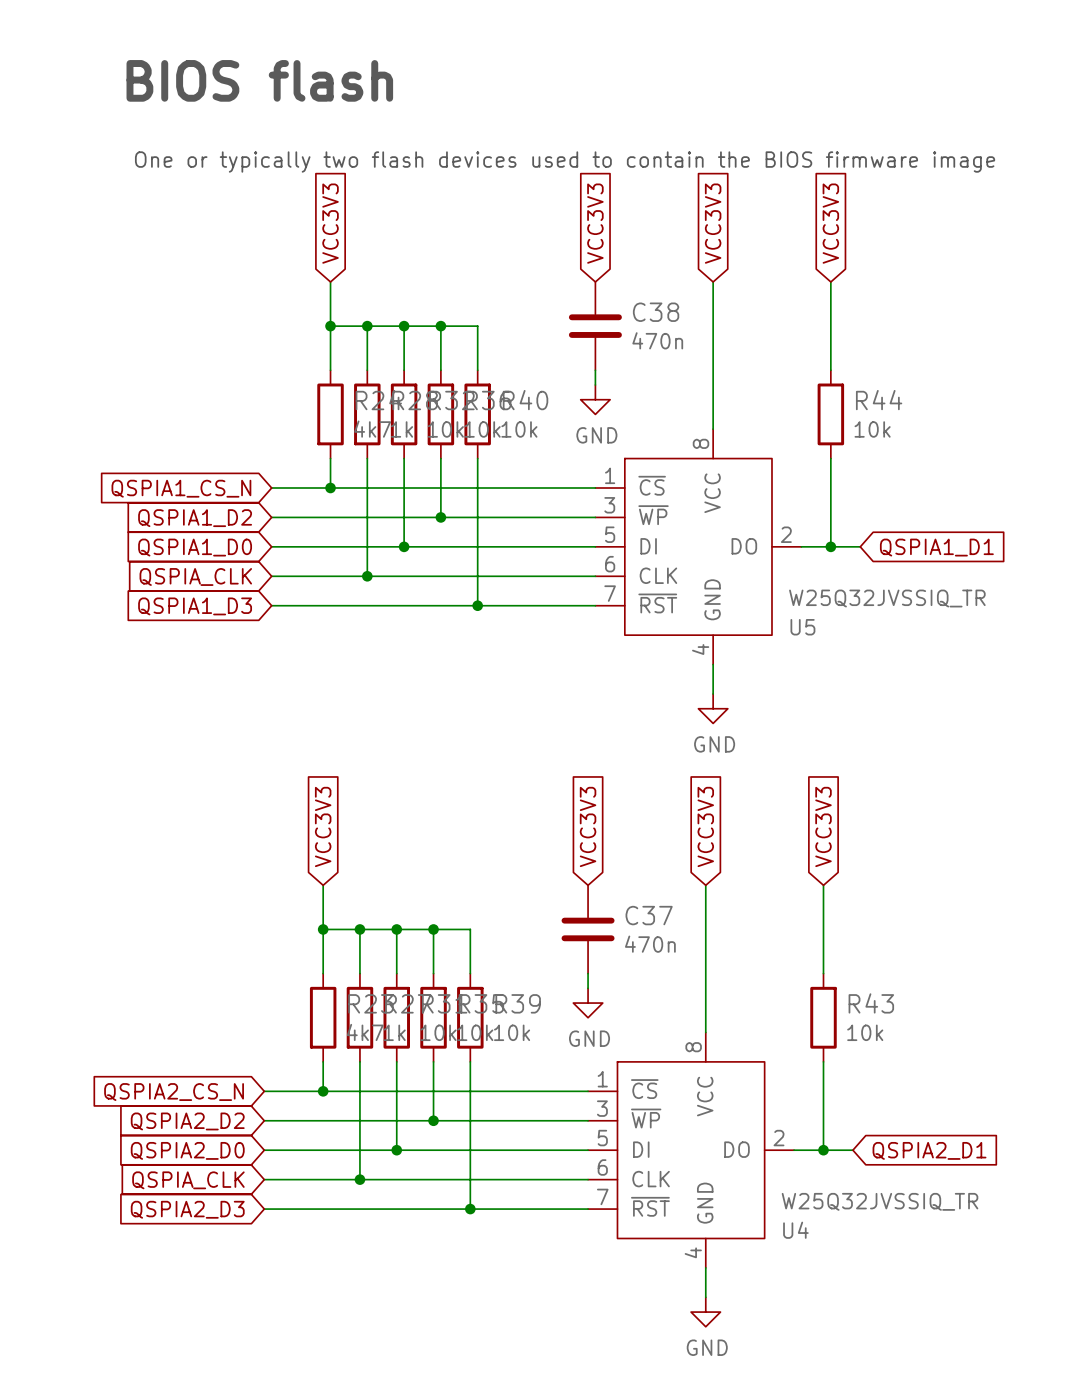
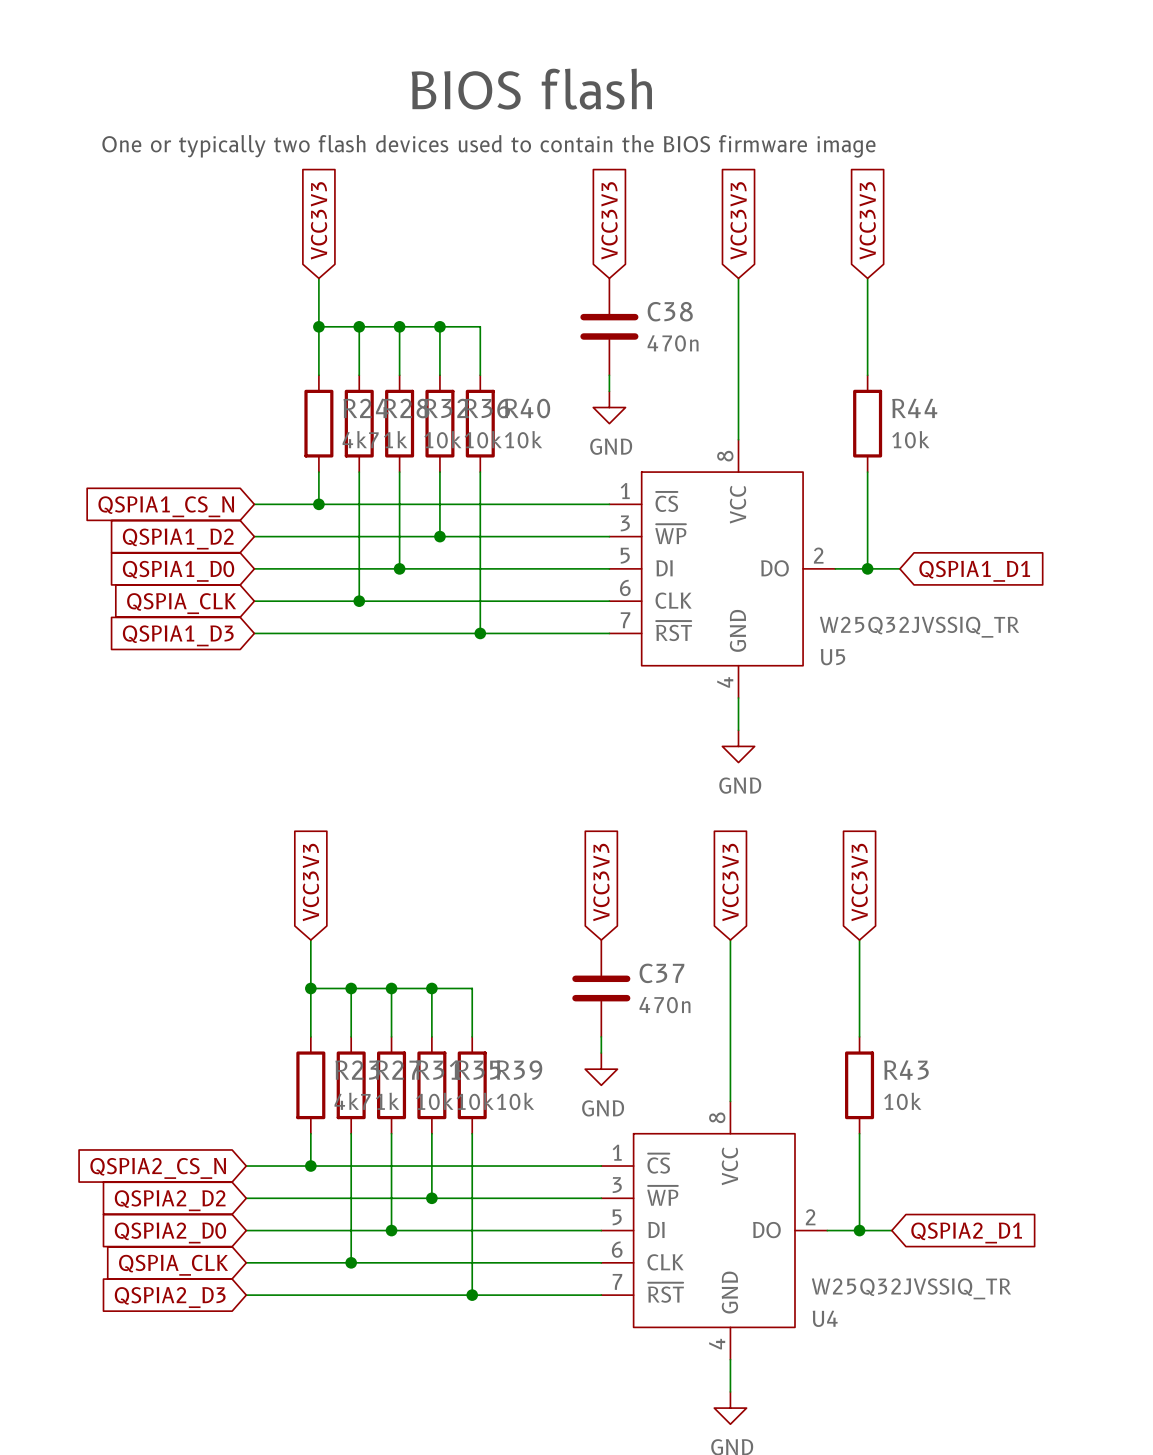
text: BIOS flash (259, 80) -> none
text: none -> BIOS flash (531, 89)

